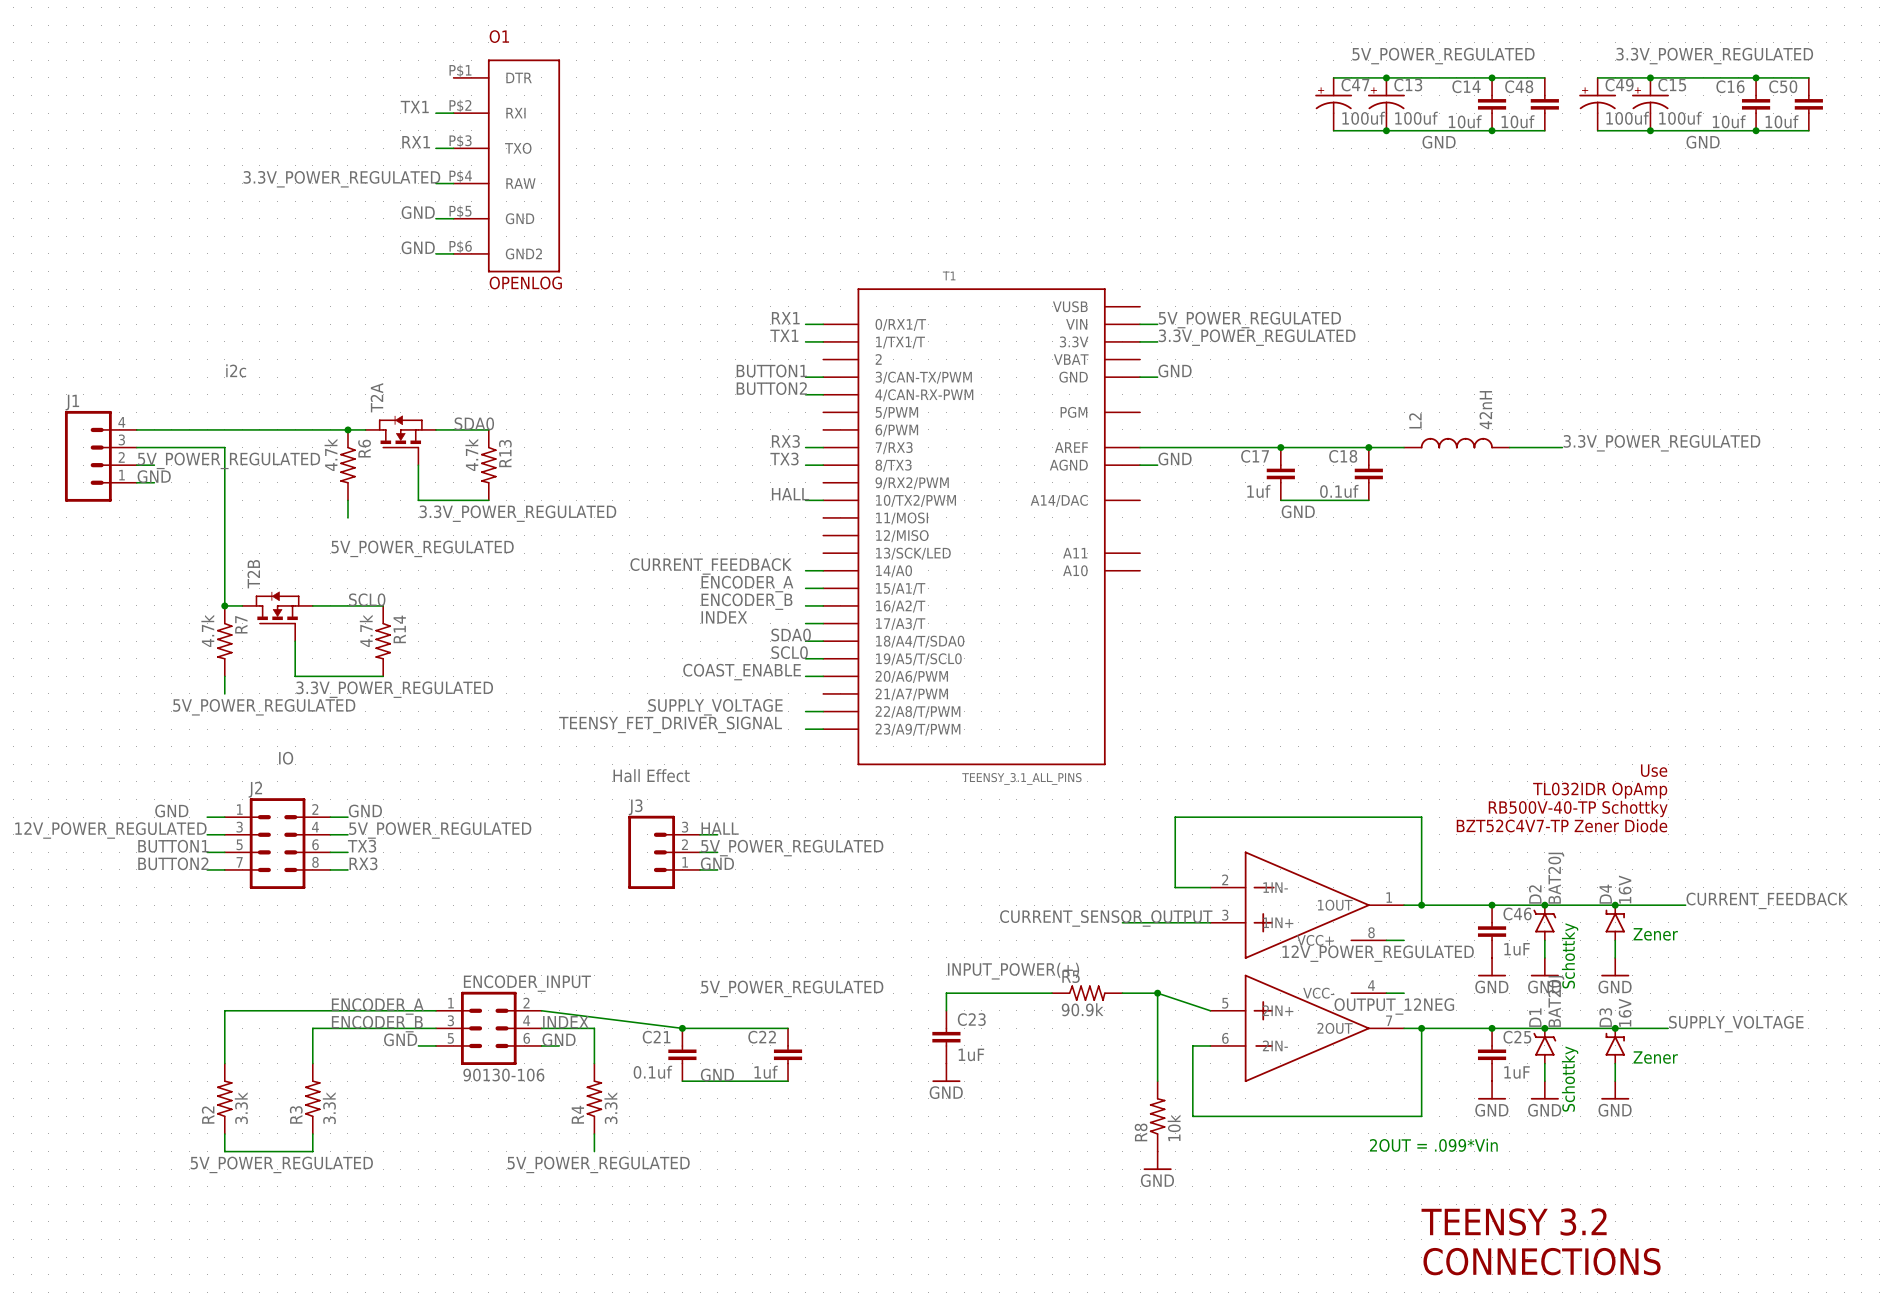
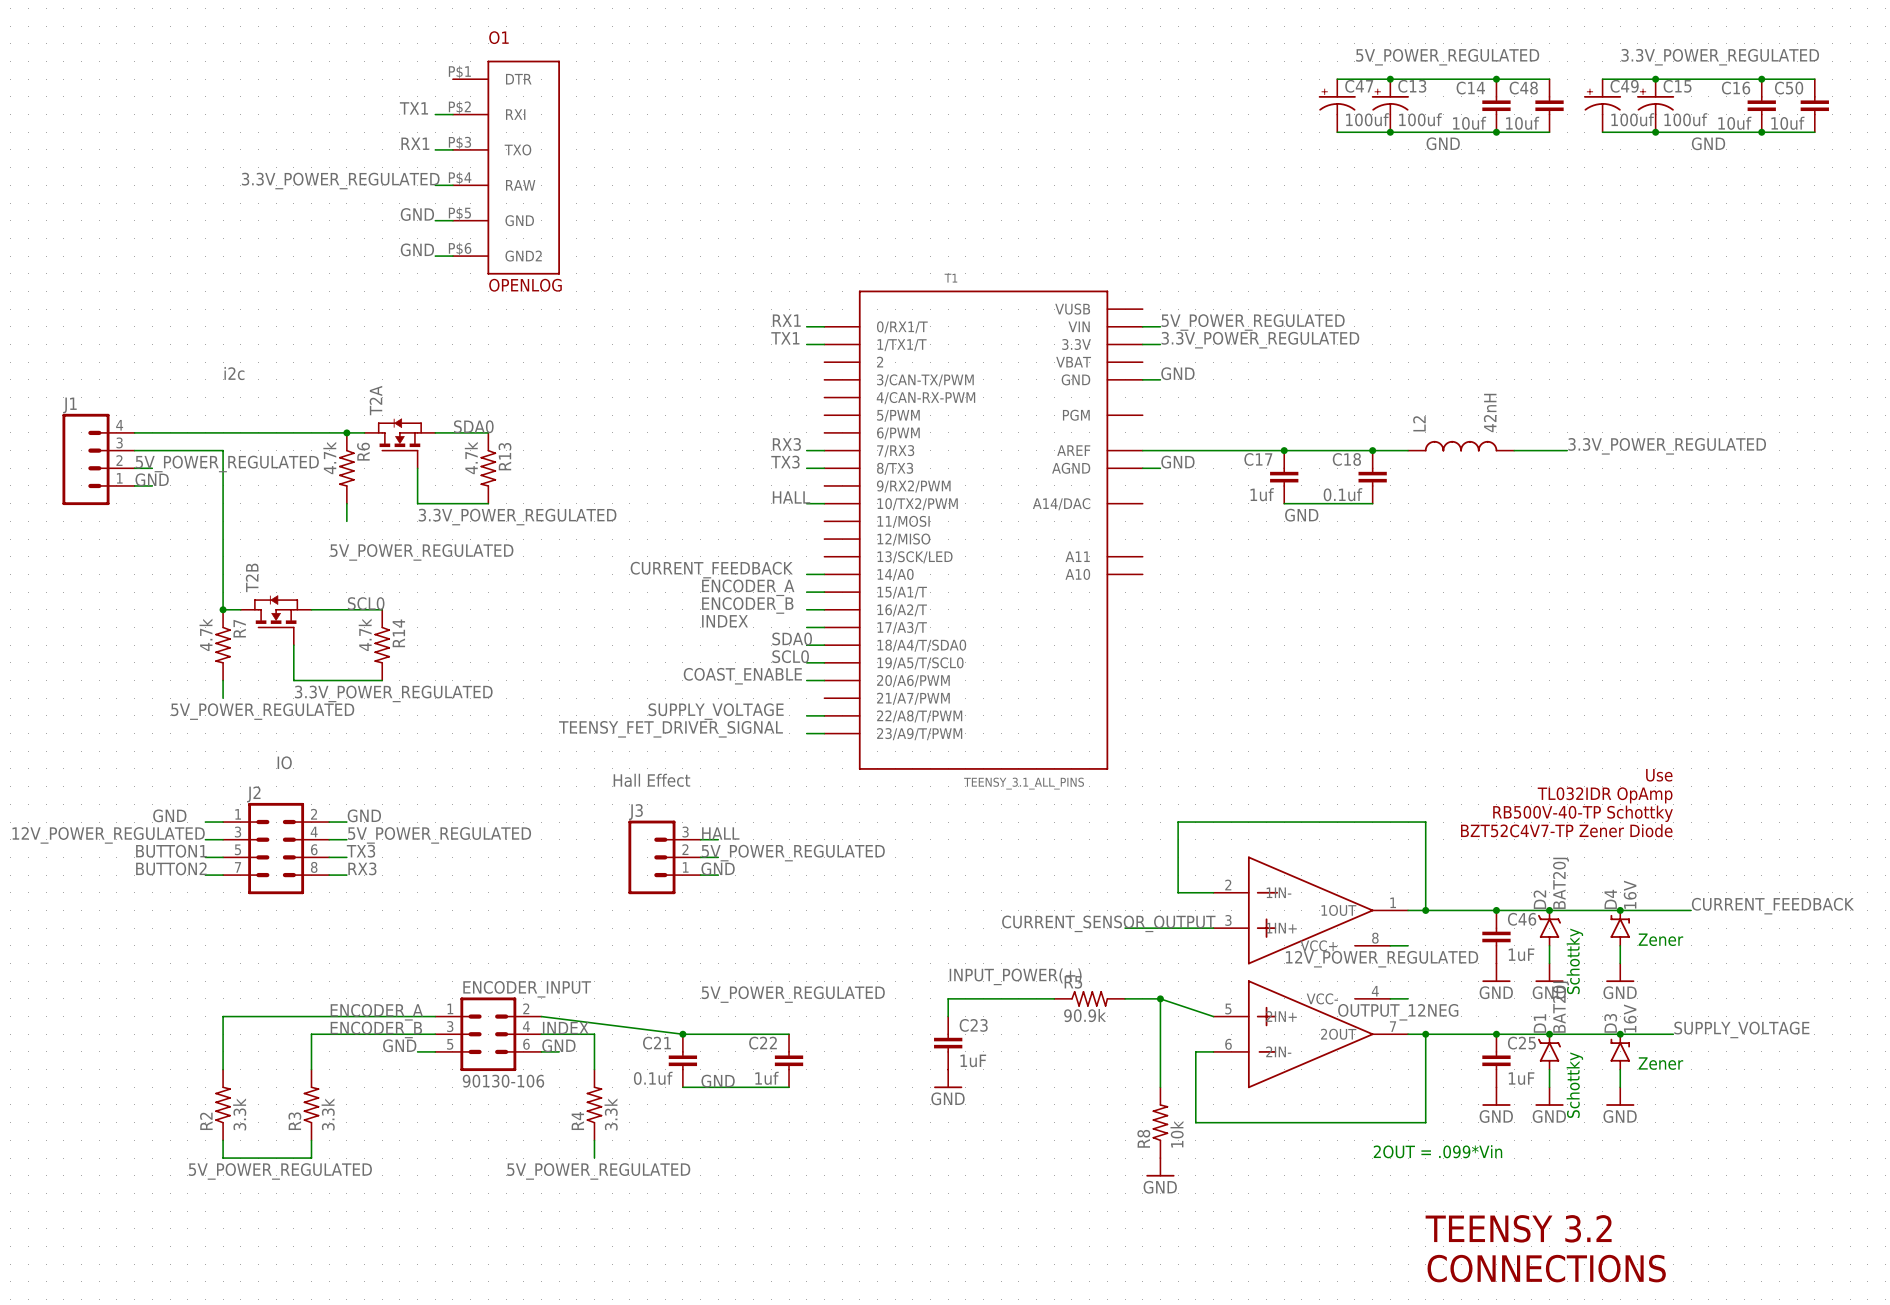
label: BUTTON1 (771, 371) -> none
wire: (805, 377) (823, 377) -> none
label: BUTTON2 (771, 388) -> none
wire: (805, 394) (823, 394) -> none

